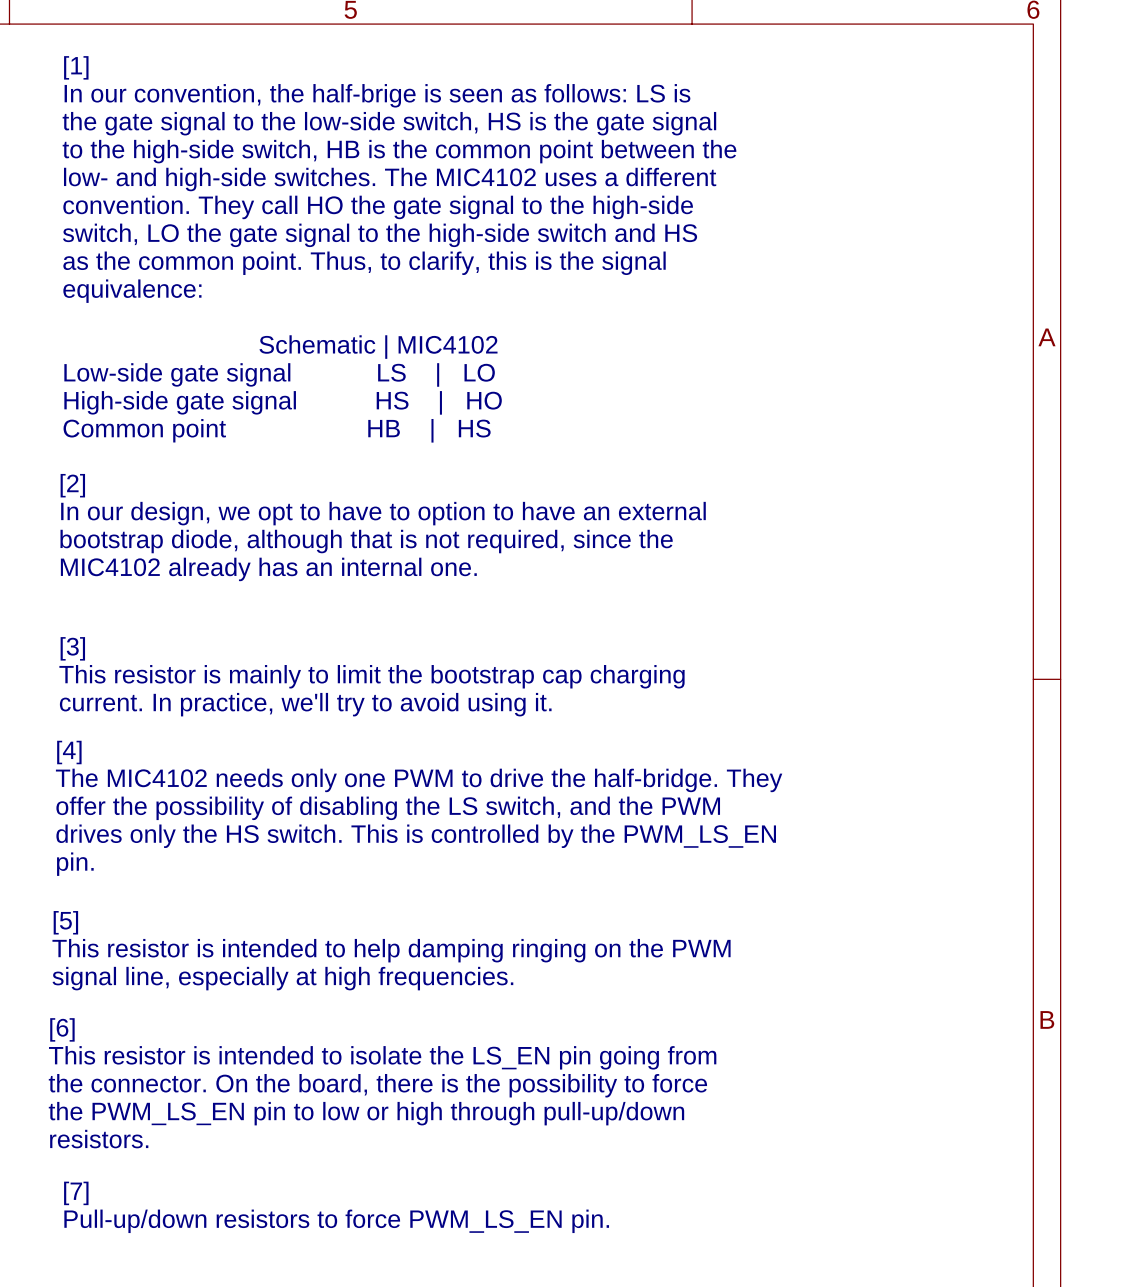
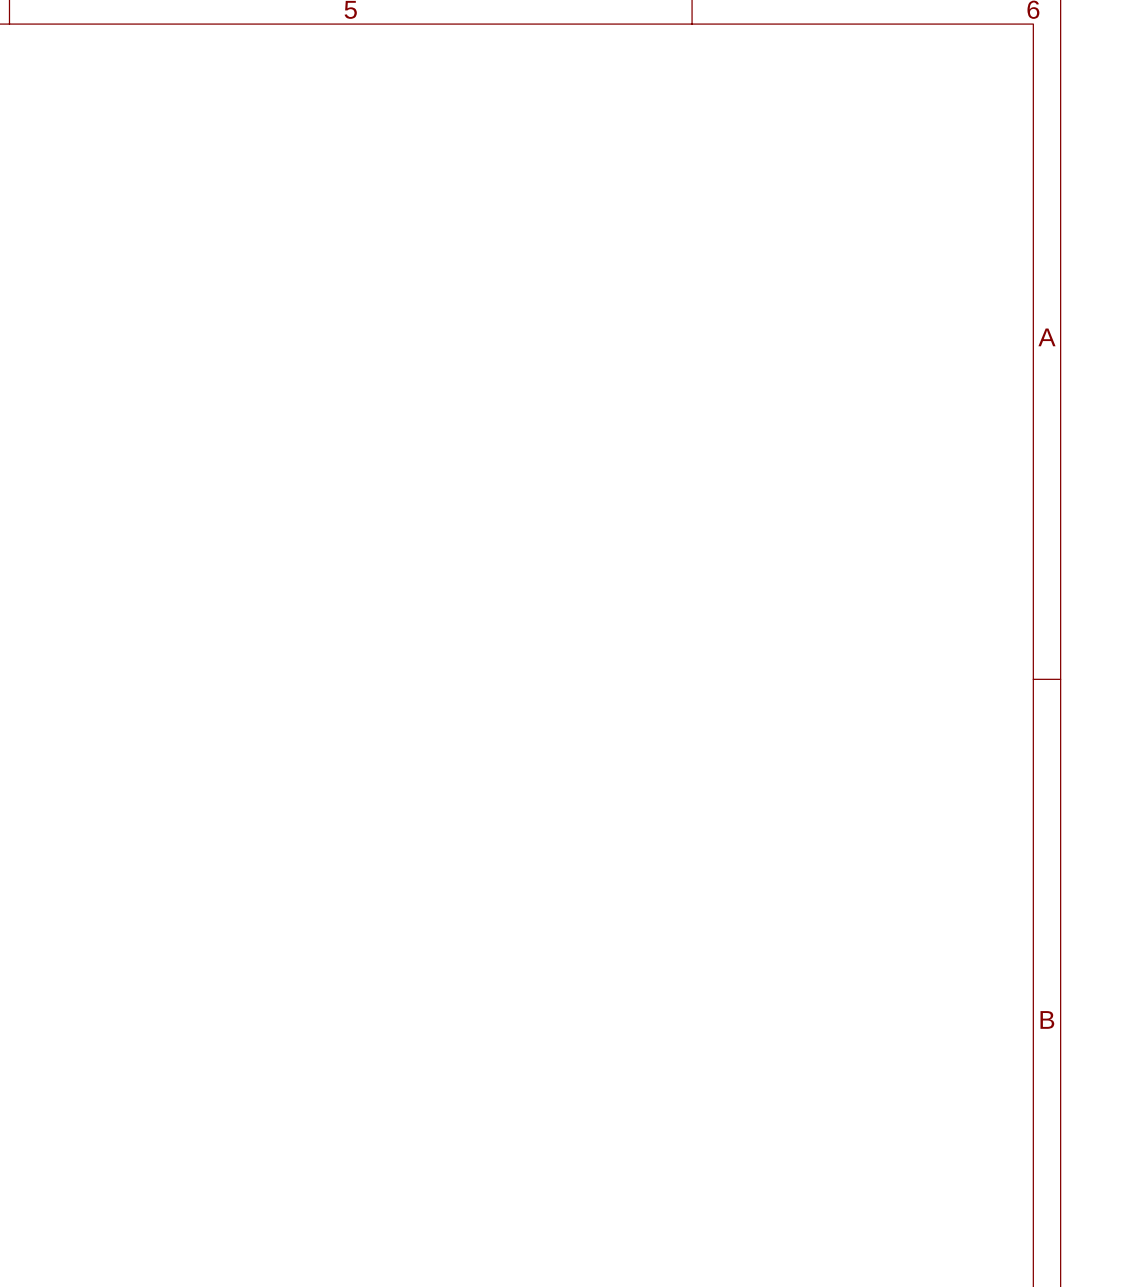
text: [1] (76, 67) -> none
text: In our convention, the half-brige is seen as follows: LS is (377, 95) -> none
text: the gate signal to the low-side switch, HS is the gate signal (389, 123) -> none
text: to the high-side switch, HB is the common point between the (399, 151) -> none
text: low- and high-side switches. The MIC4102 uses a different (390, 179) -> none
text: convention. They call HO the gate signal to the high-side (378, 207) -> none
text: switch, LO the gate signal to the high-side switch and HS (380, 235) -> none
text: as the common point. Thus, to clarify, this is the signal (364, 263) -> none
text: equivalence: (132, 291) -> none
text: Schematic | MIC4102 (378, 347) -> none
text: Low-side gate signal LS | LO (279, 374) -> none
text: High-side gate signal HS | HO (283, 402) -> none
text: Common point HB | HS (277, 430) -> none
text: [2] (72, 485) -> none
text: In our design, we opt to have to option to have an external (383, 513) -> none
text: bootstrap diode, although that is not required, since the (366, 541) -> none
text: MIC4102 already has an internal one. (268, 569) -> none
text: [3] (72, 648) -> none
text: This resistor is mainly to limit the bootstrap cap charging (372, 676) -> none
text: current. In practice, we'll try to avoid using it. (305, 704) -> none
text: [4] (69, 752) -> none
text: The MIC4102 needs only one PWM to drive the half-bridge. They (419, 780) -> none
text: offer the possibility of disabling the LS switch, and the PWM (388, 808) -> none
text: drives only the HS switch. This is controlled by the PWM_LS_EN (416, 836) -> none
text: pin. (75, 864) -> none
text: [5] (65, 922) -> none
text: This resistor is intended to help damping ringing on the PWM (391, 950) -> none
text: signal line, especially at high frequencies. (282, 978) -> none
text: [6] (62, 1029) -> none
text: This resistor is intended to isolate the LS_EN pin going from (382, 1057) -> none
text: the connector. On the board, there is the possibility to force (377, 1085) -> none
text: the PWM_LS_EN pin to low or high through pull-up/down (366, 1113) -> none
text: resistors. (99, 1139) -> none
text: [7] (76, 1193) -> none
text: Pull-up/down resistors to force PWM_LS_EN pin. (336, 1221) -> none

